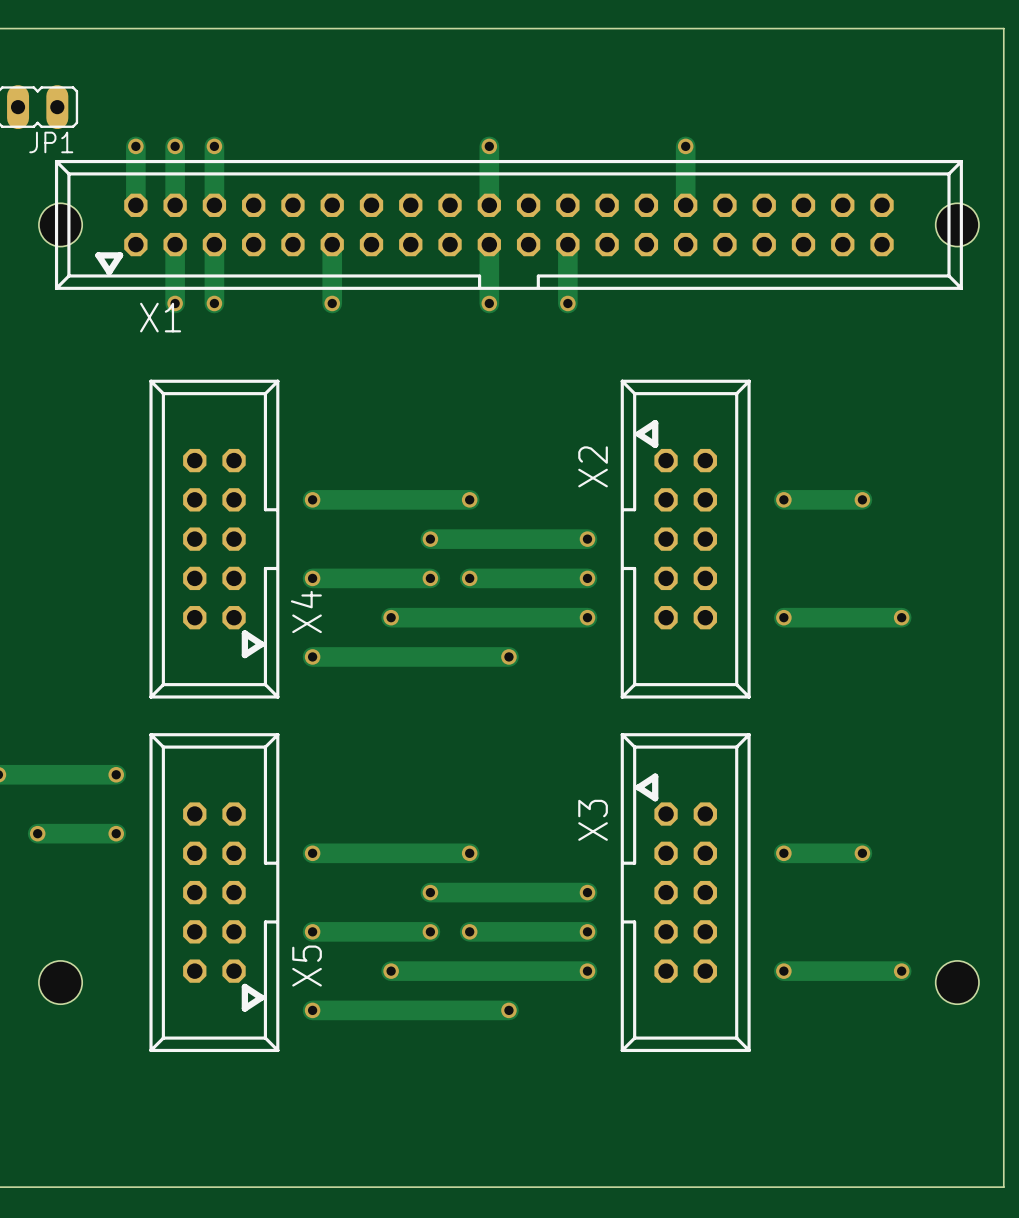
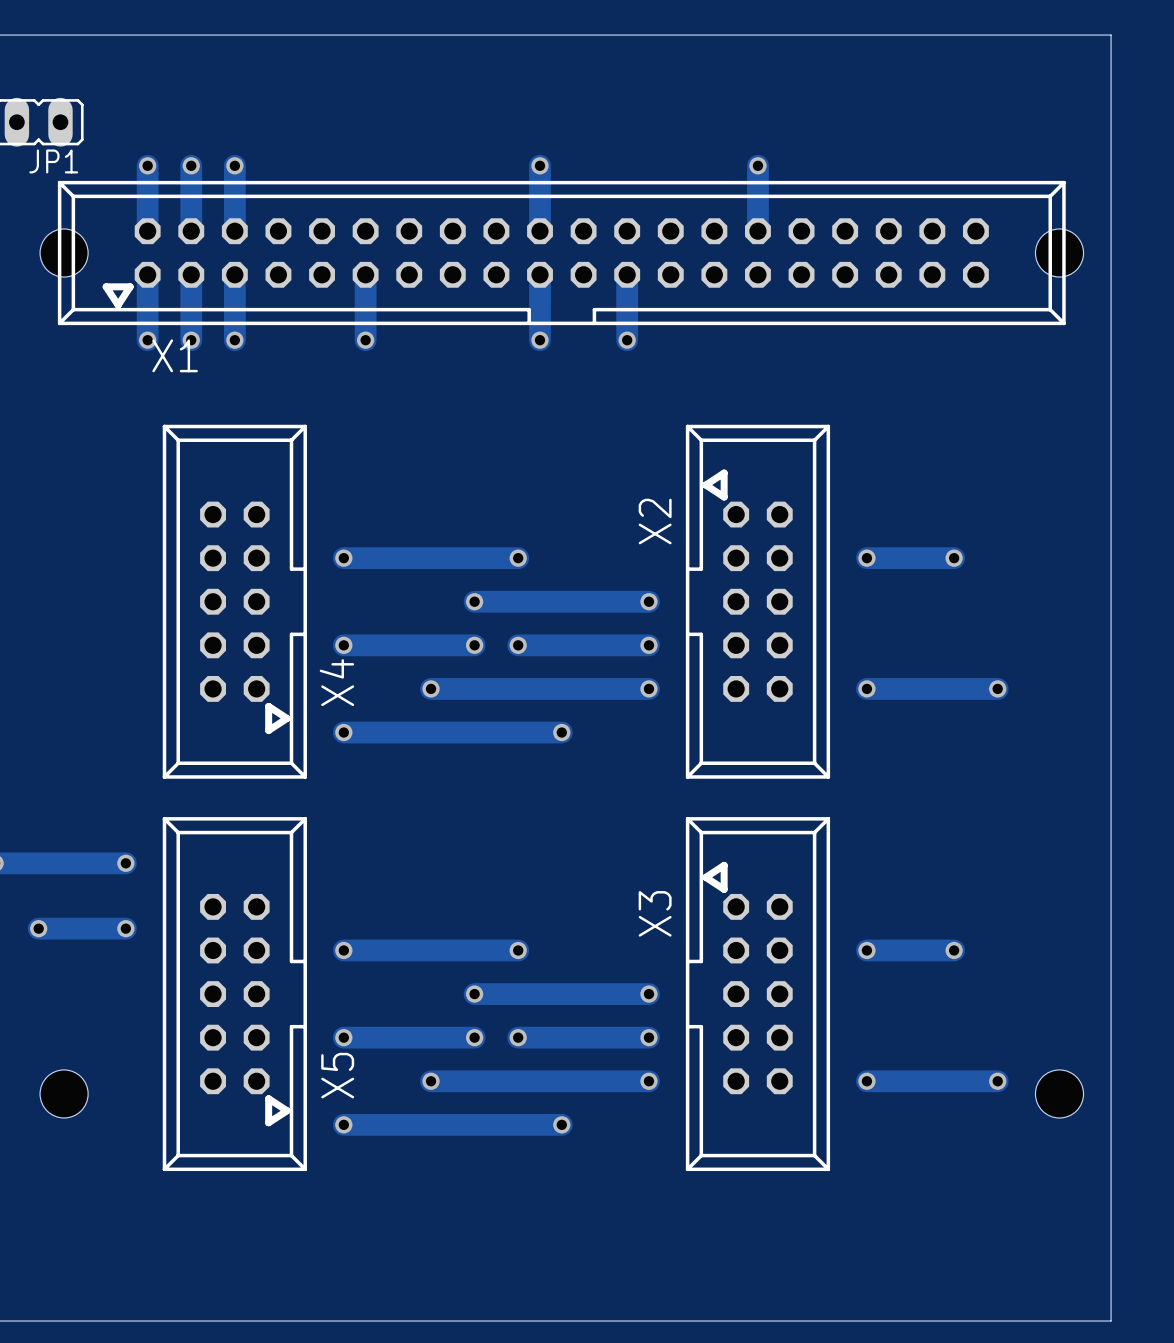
track: none -> (147, 274) (147, 340)
via: none -> (147, 340)

